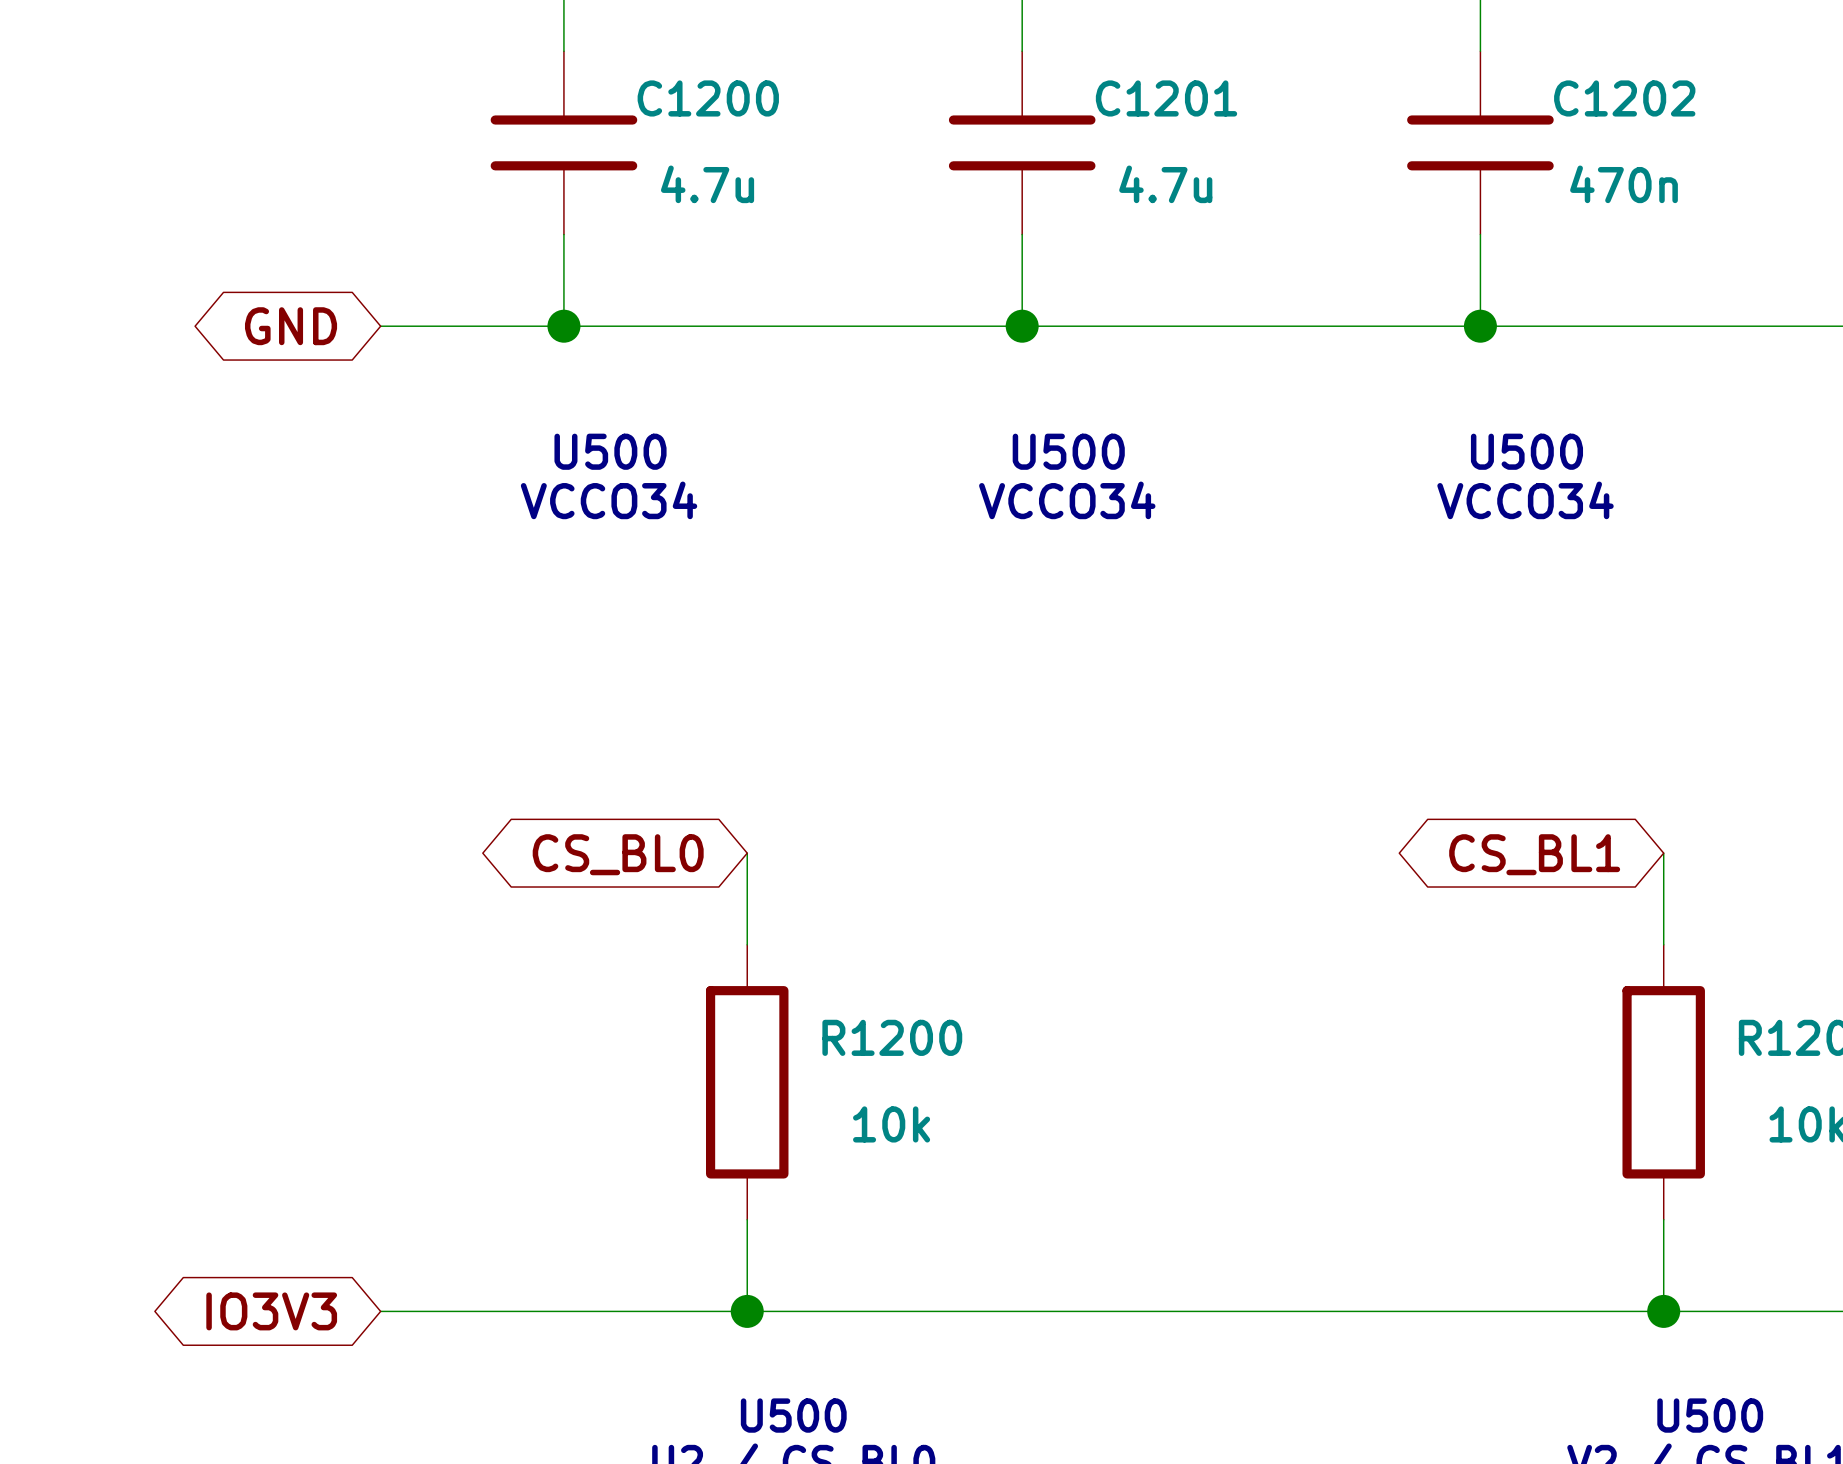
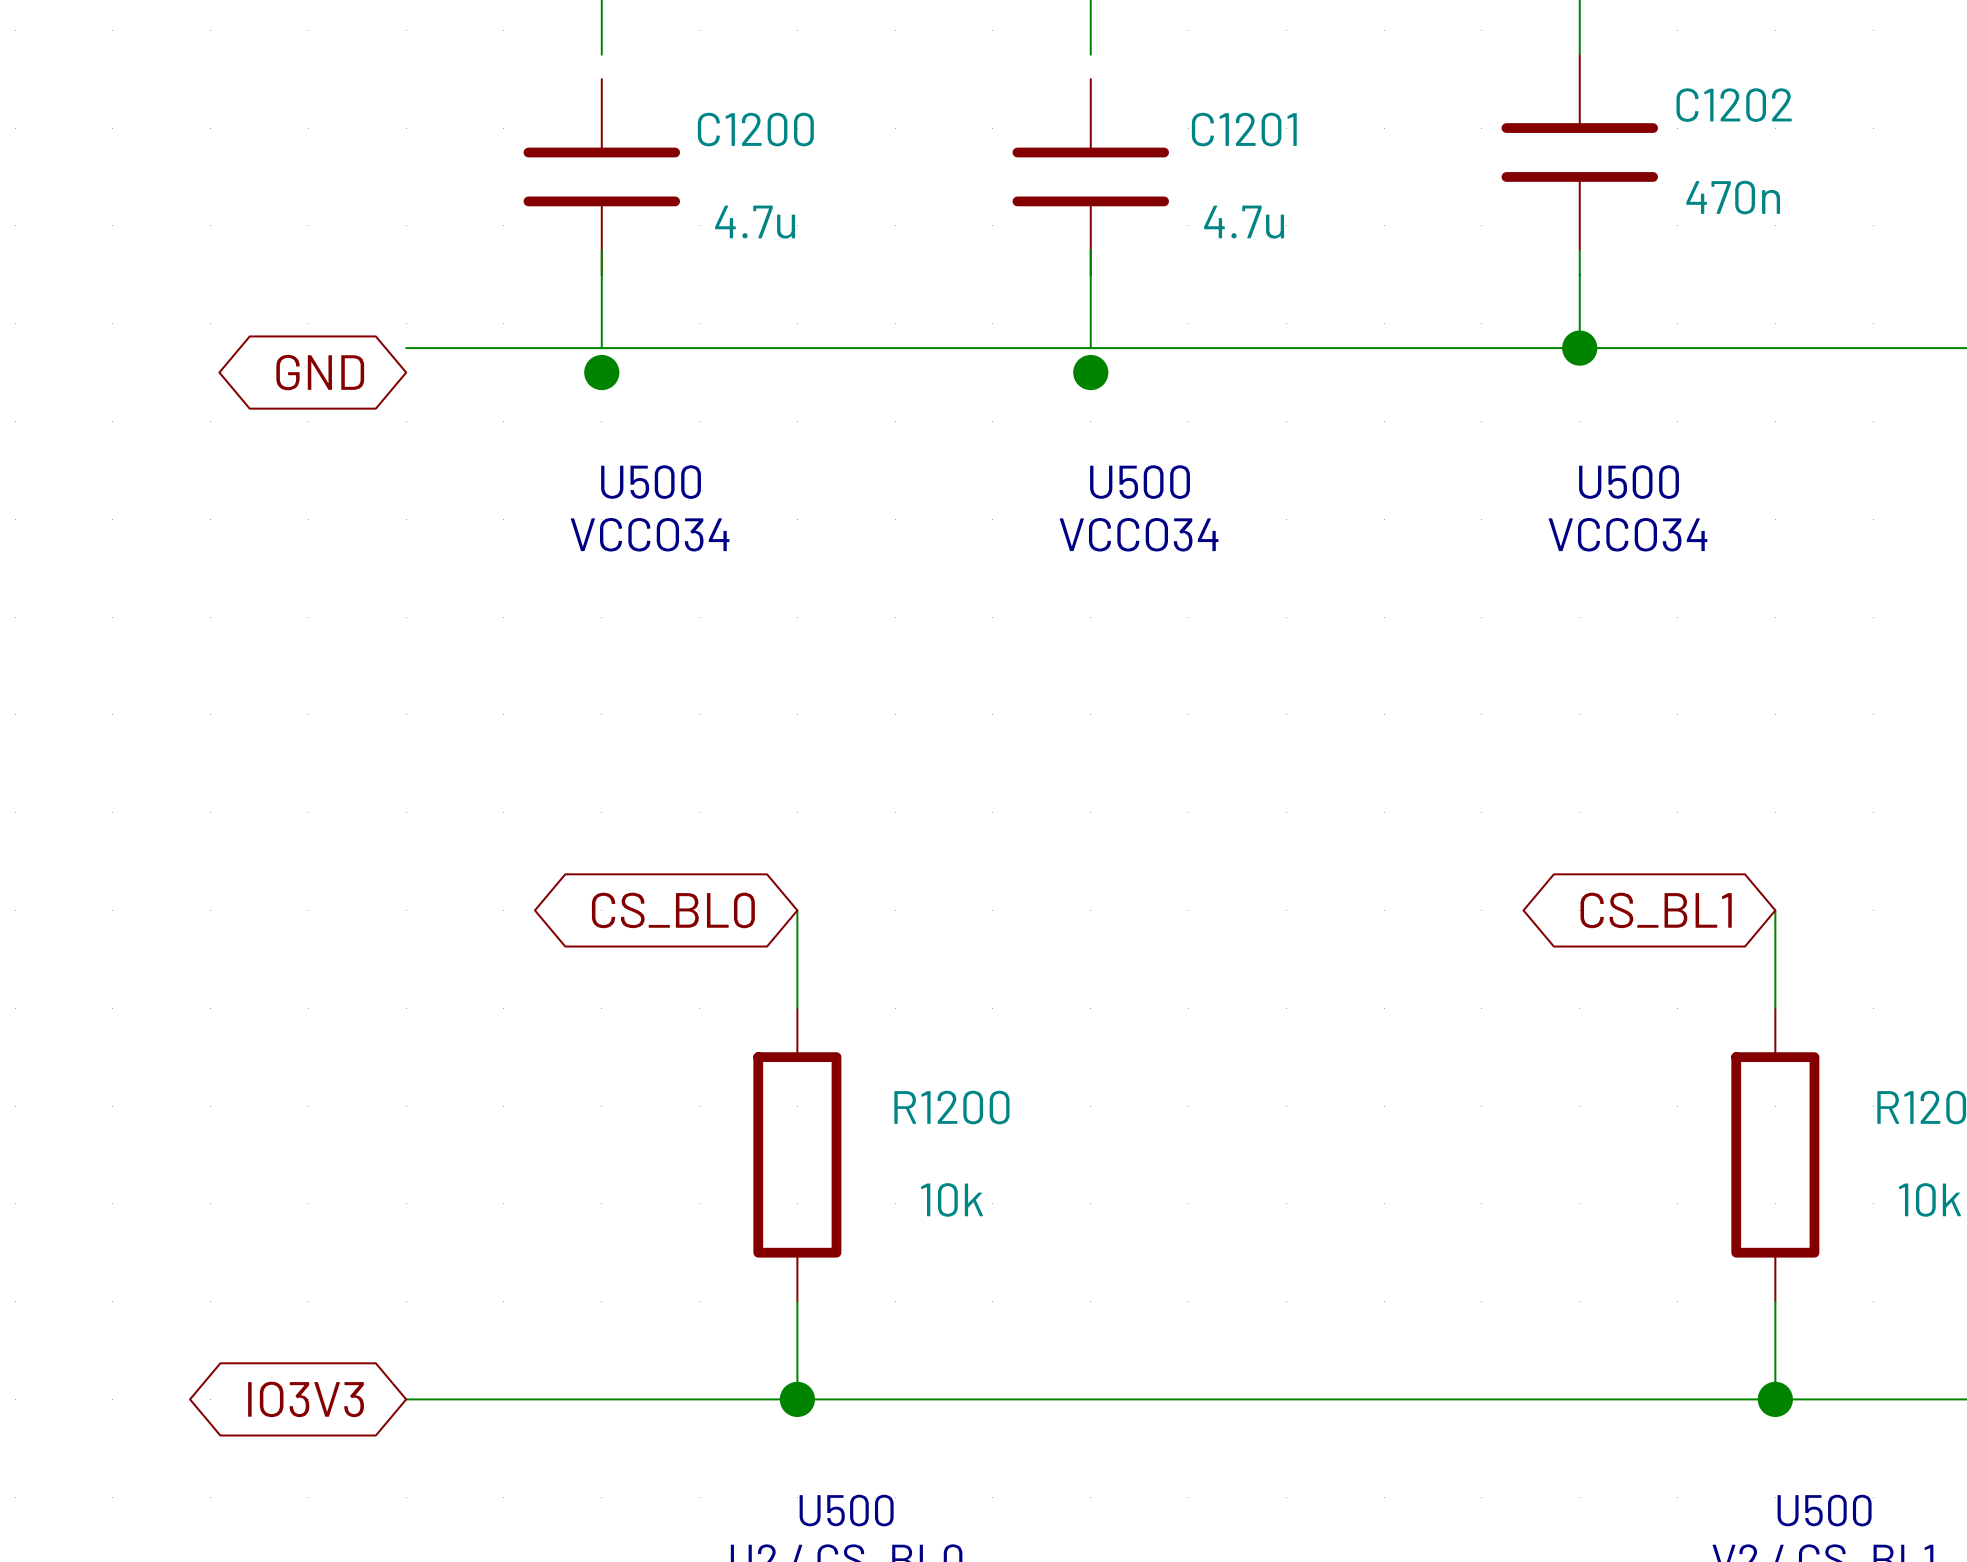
C1200 position: (563, 142) -> (601, 176)
C1201 position: (1022, 142) -> (1090, 176)
global label position: GND (291, 326) -> GND (320, 372)
junction position: (563, 326) -> (601, 372)
junction position: (1022, 326) -> (1090, 372)

